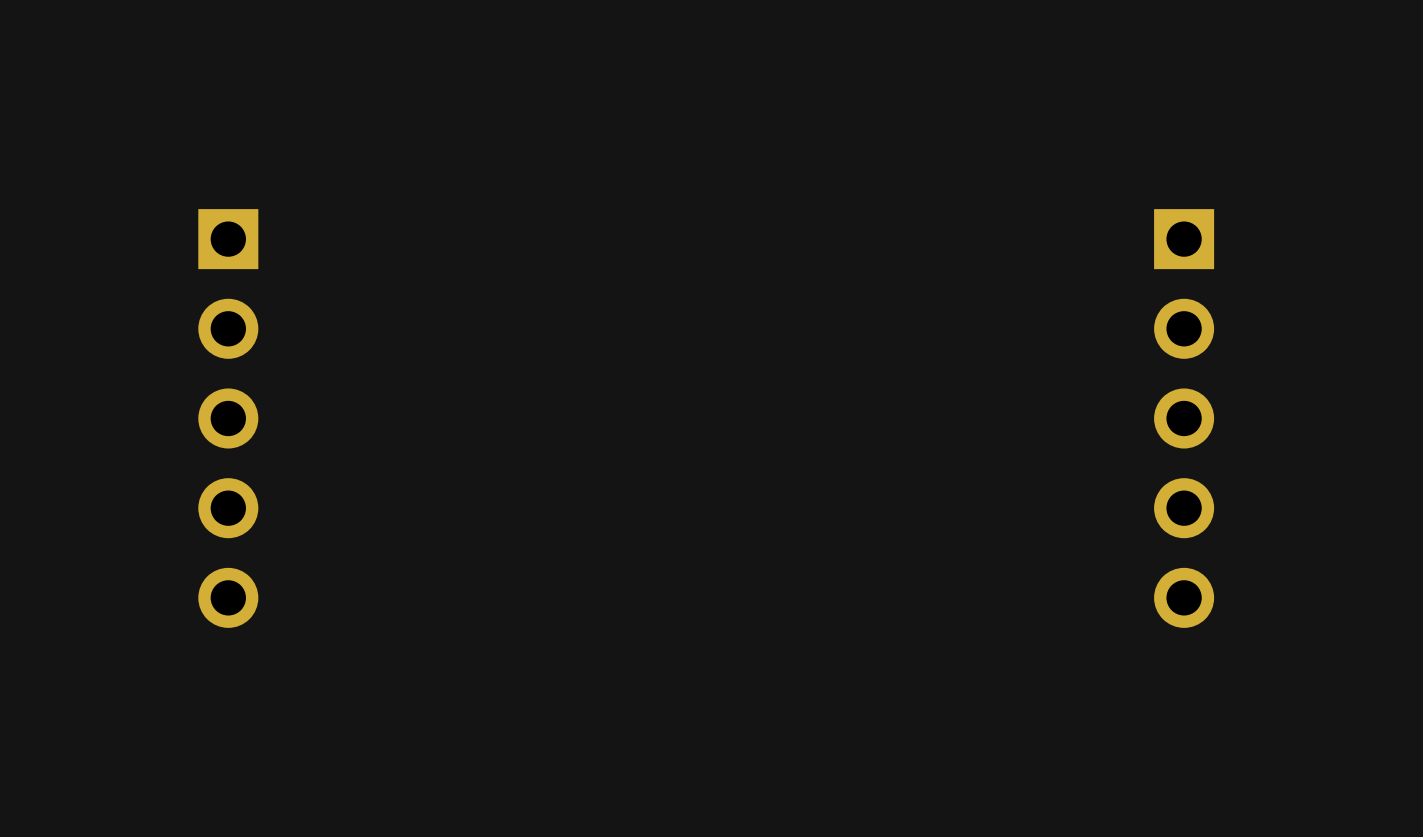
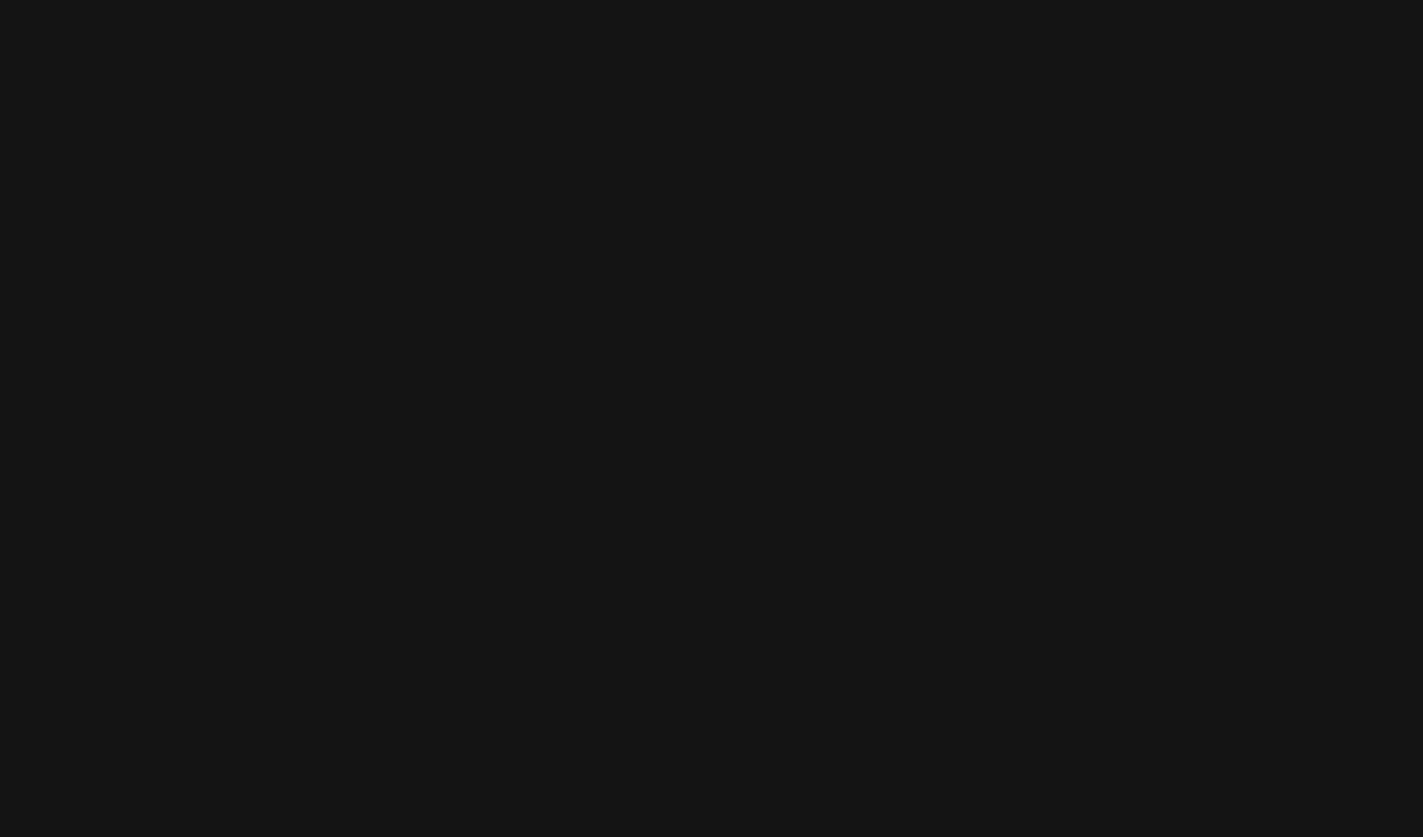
part: (228, 418) -> none
part: (1184, 418) -> none

